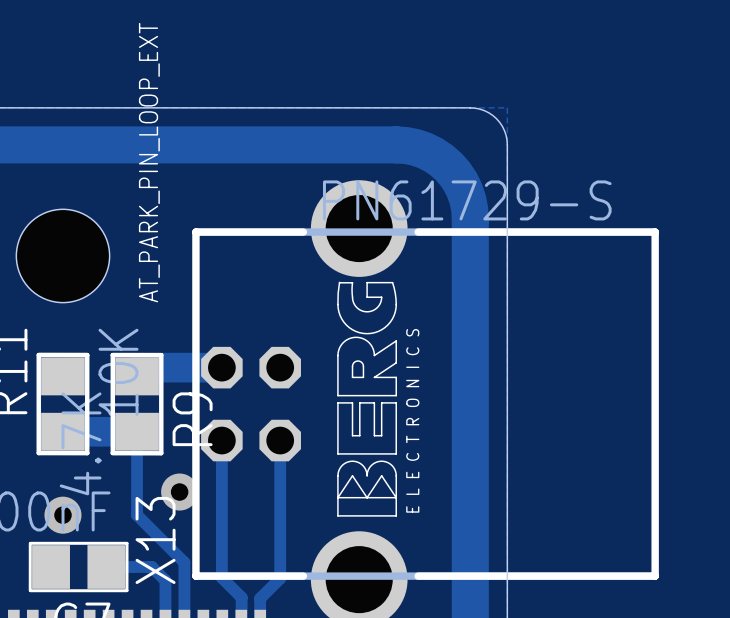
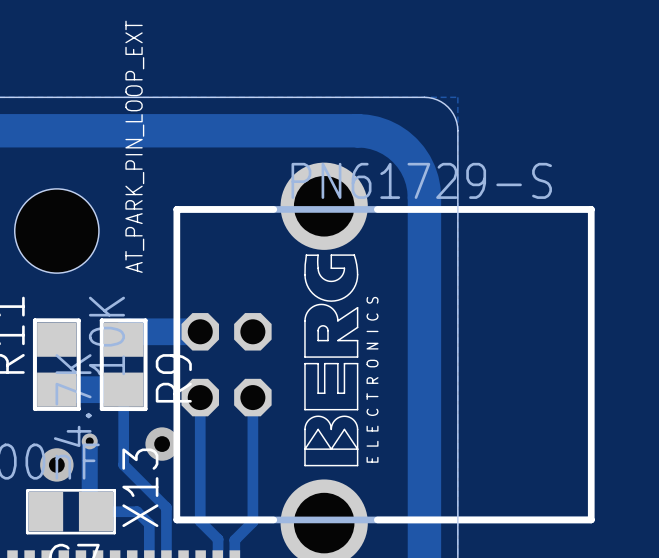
track: none -> (89, 441) (89, 505) (96, 511)
via: none -> (89, 441)

